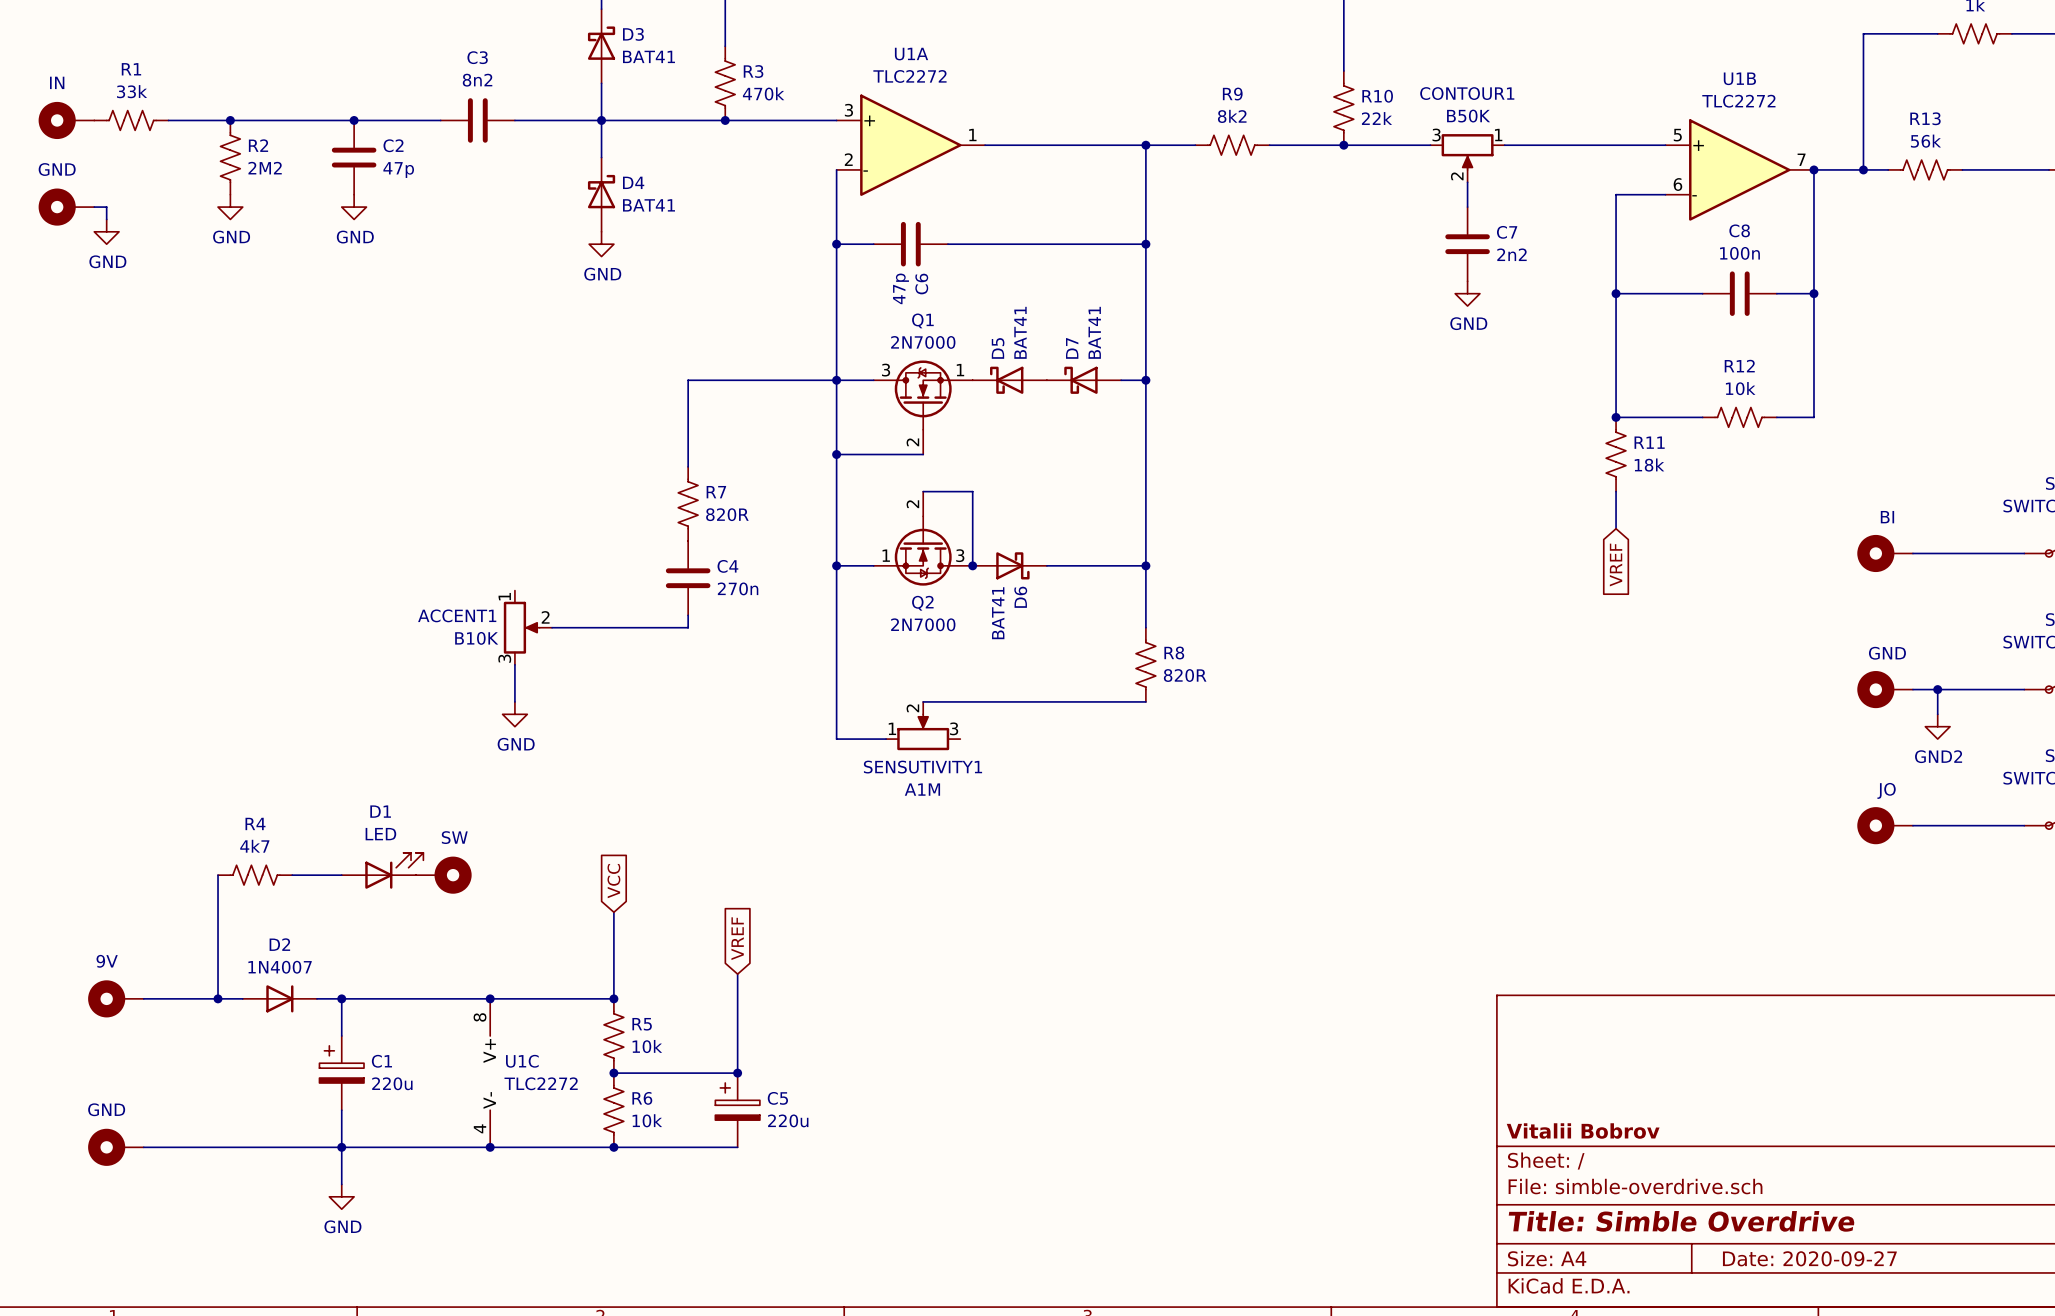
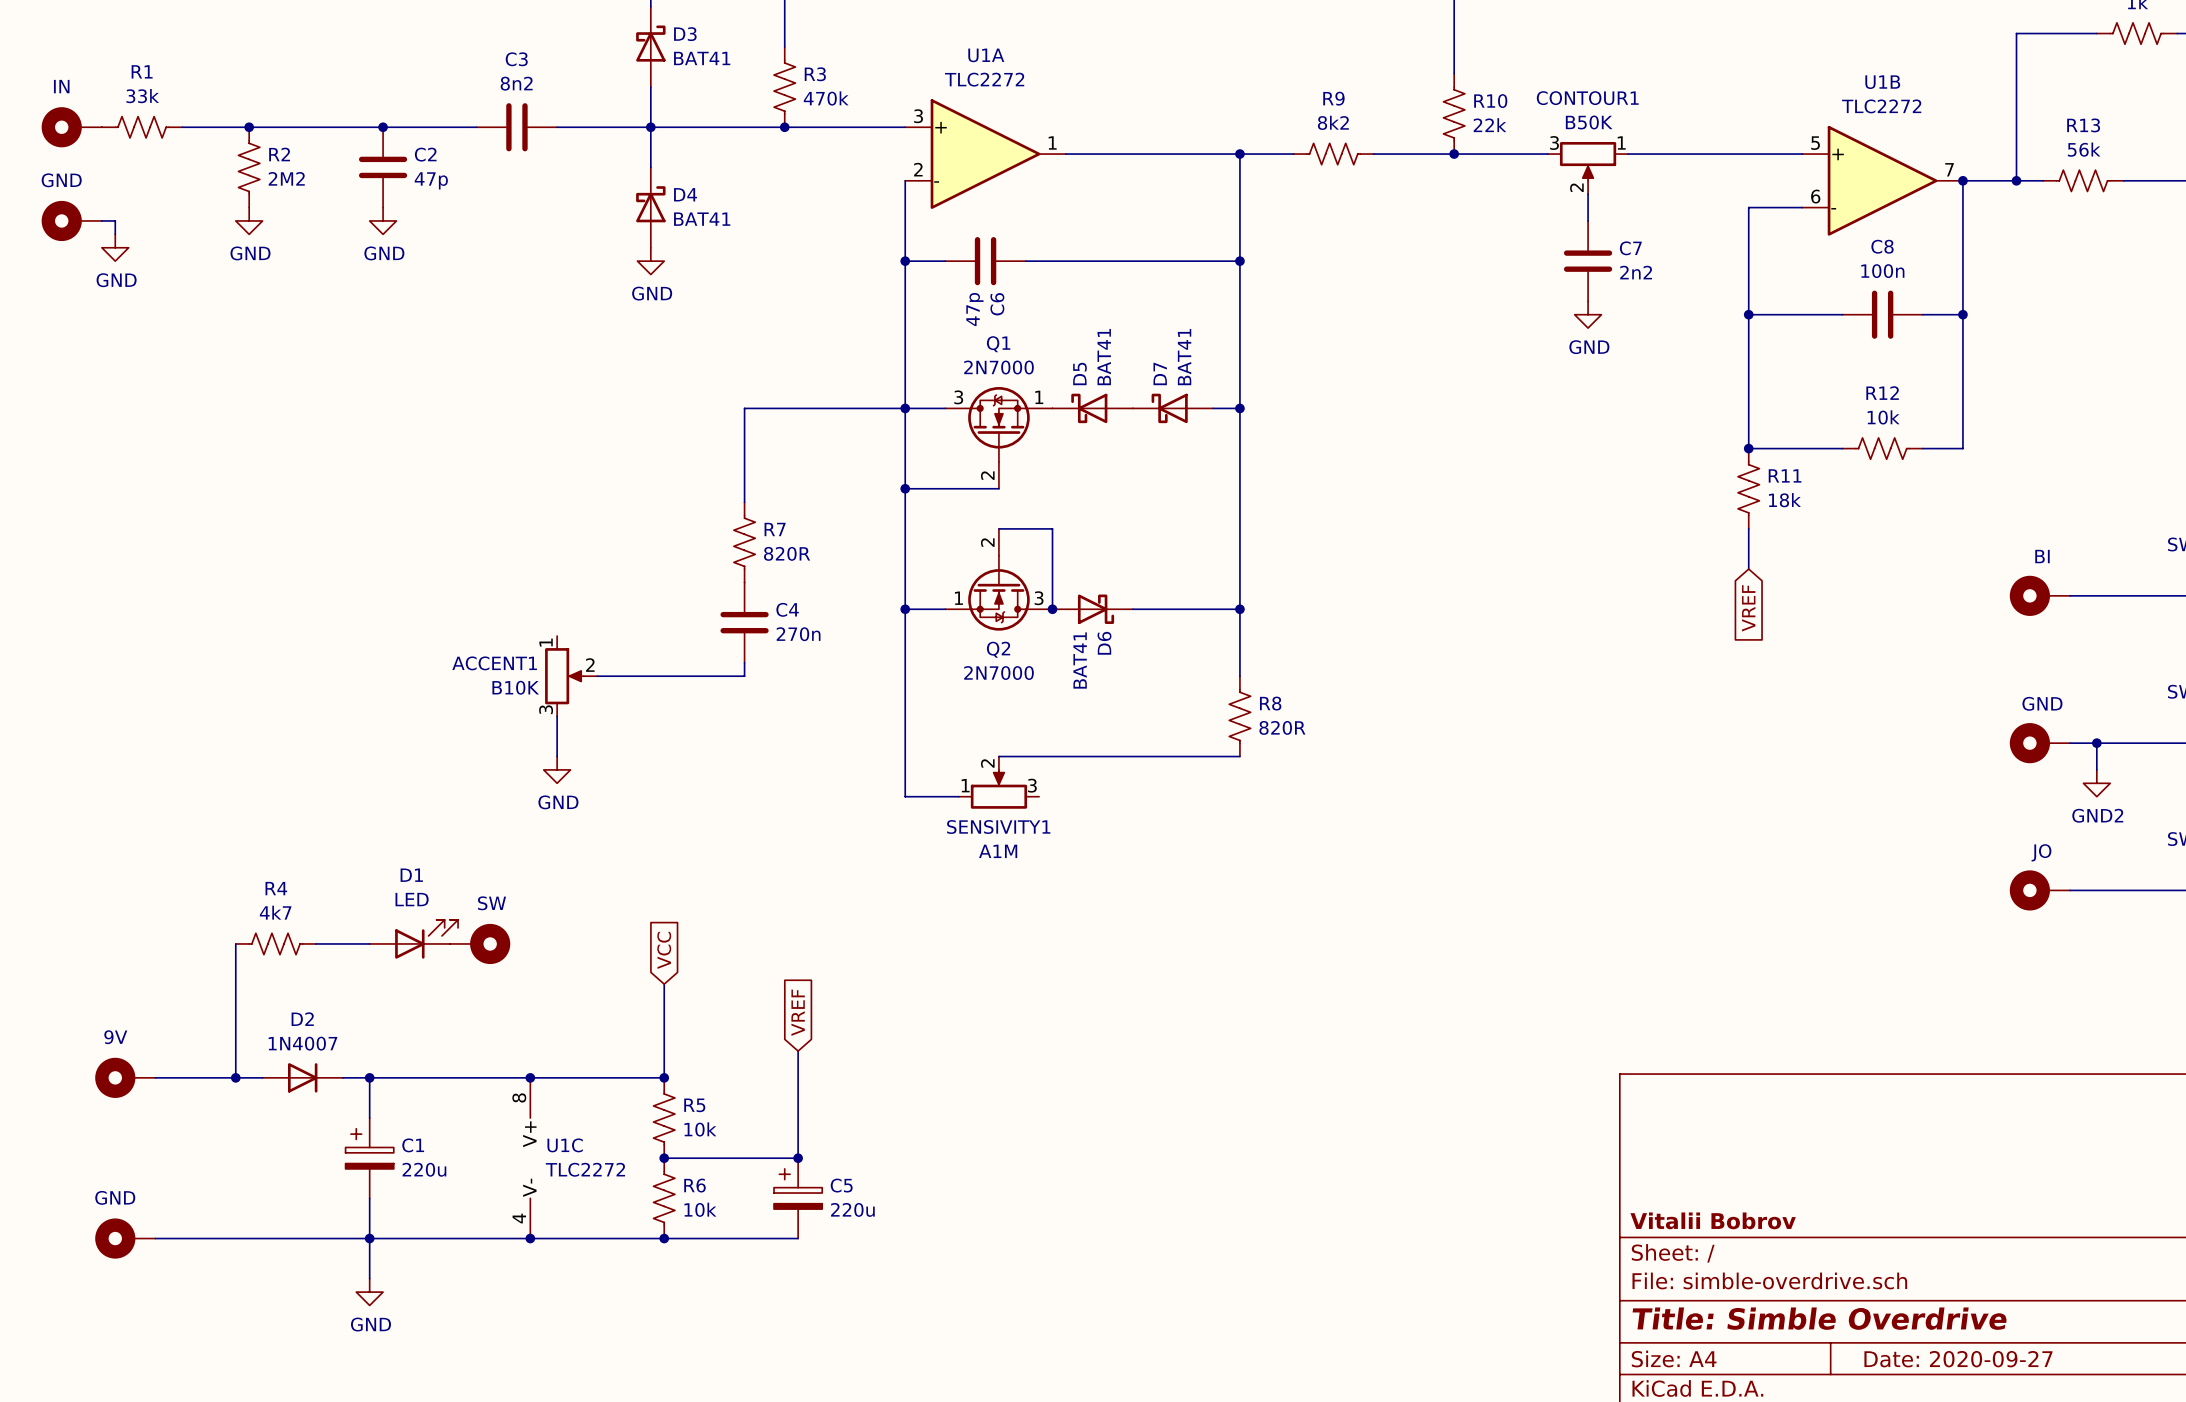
SENSUTIVITY1 name: SENSUTIVITY1 (922, 767) -> SENSIVITY1 (998, 827)

